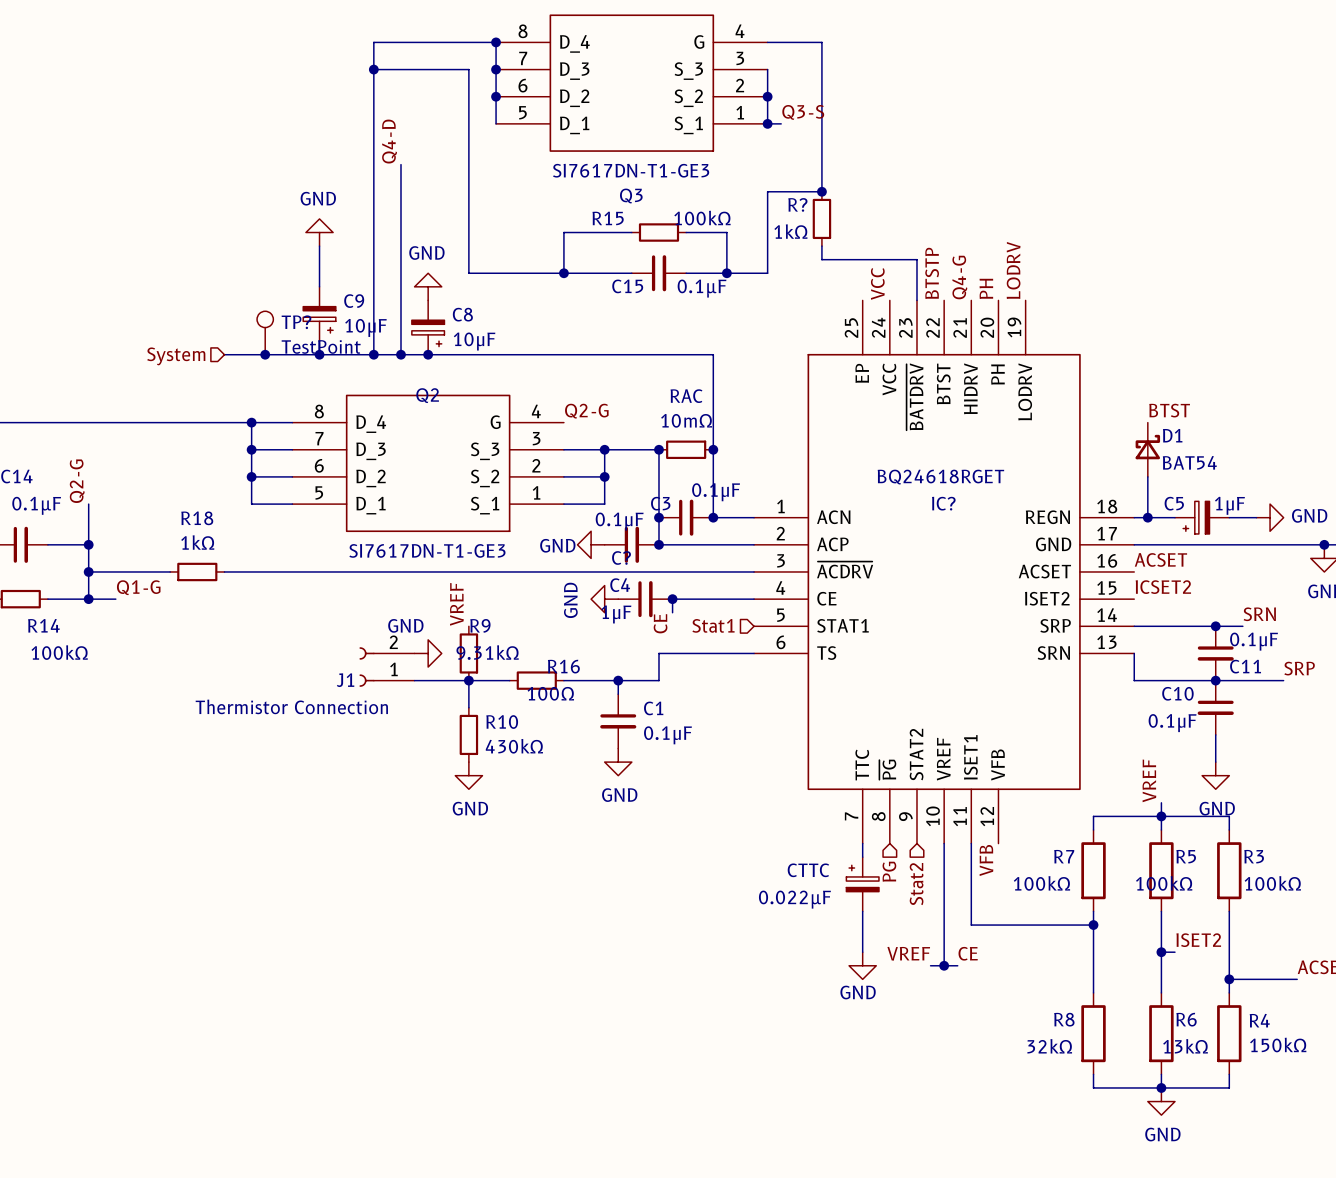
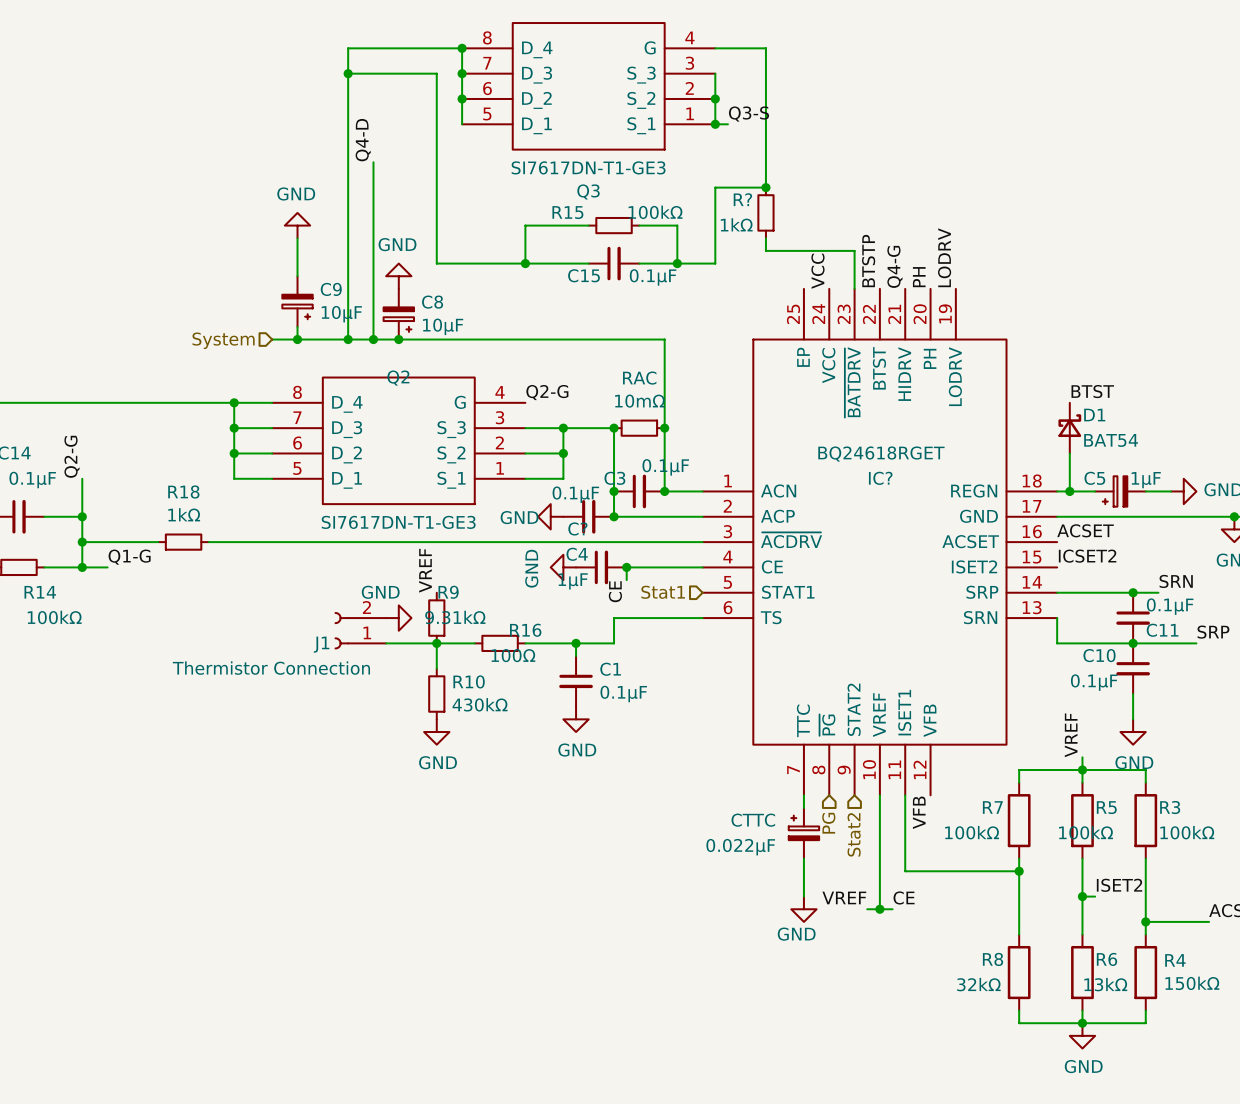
TP?: TestPoint (265, 333) -> none
wire: (224, 354) (292, 354) -> none
junction: (265, 354) -> none
hierarchical label position: System (176, 356) -> System (223, 340)

